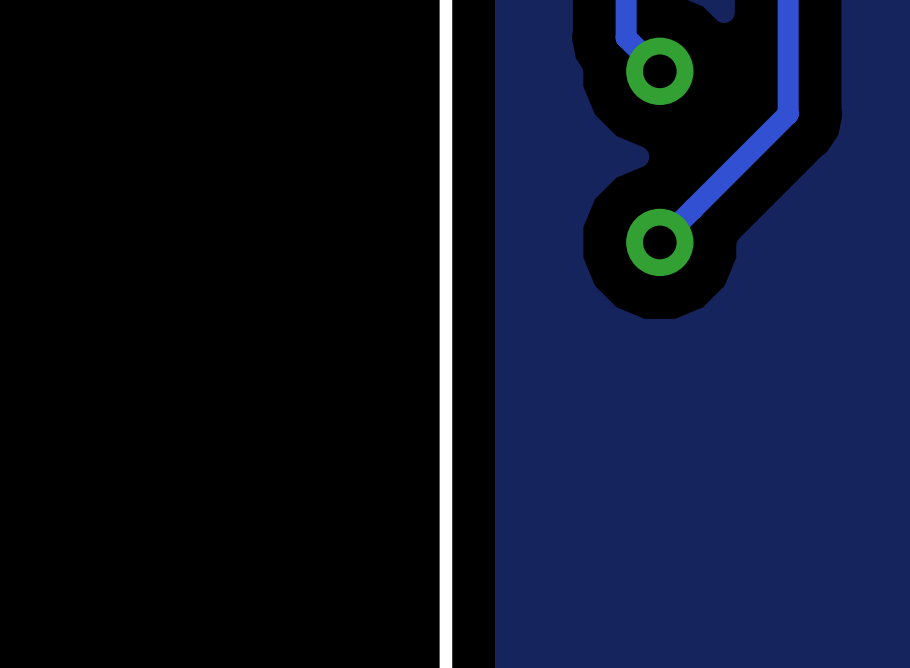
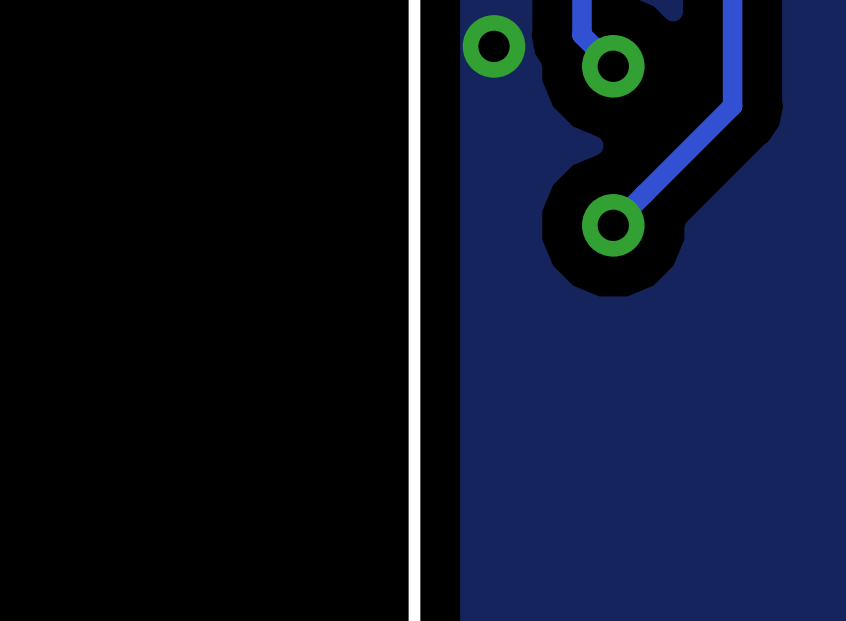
via: none -> (494, 46)

